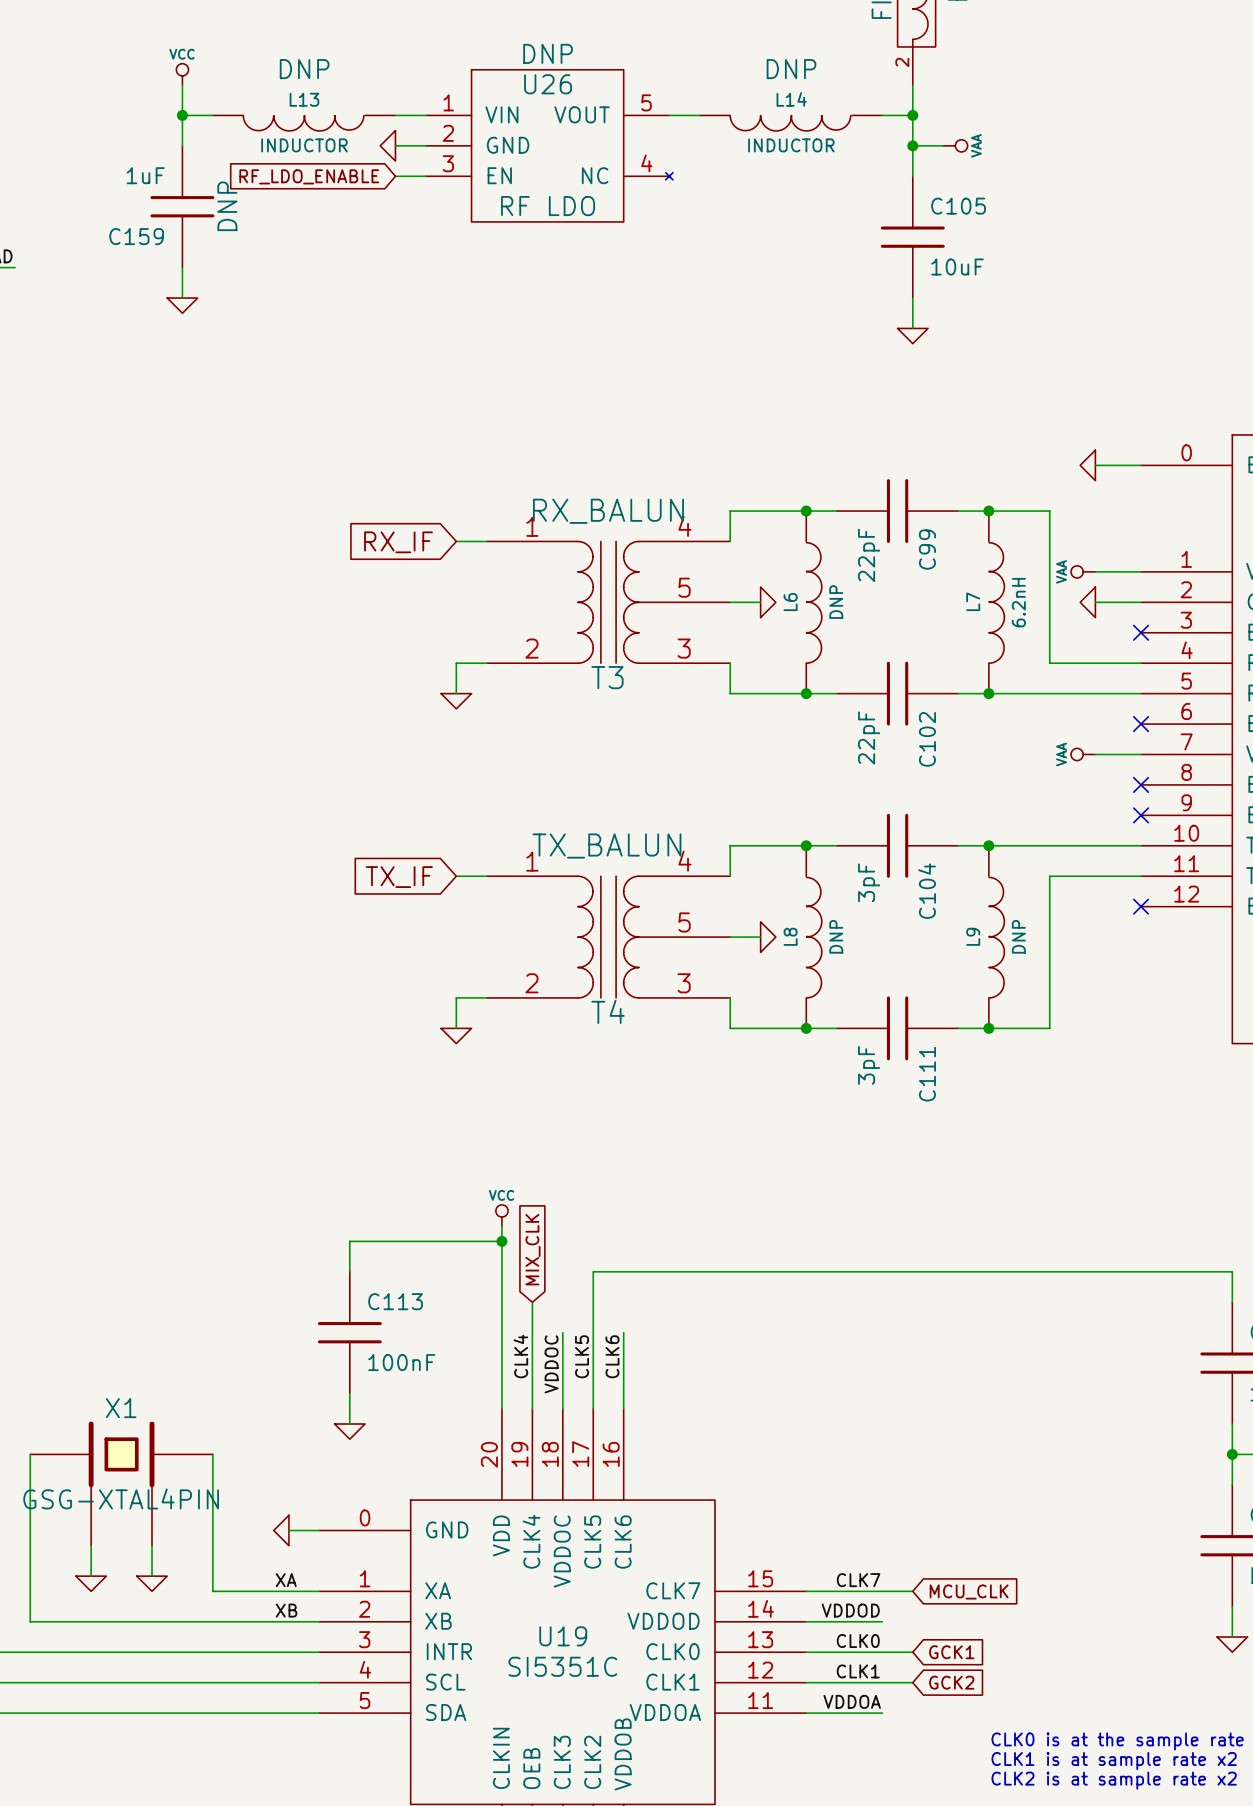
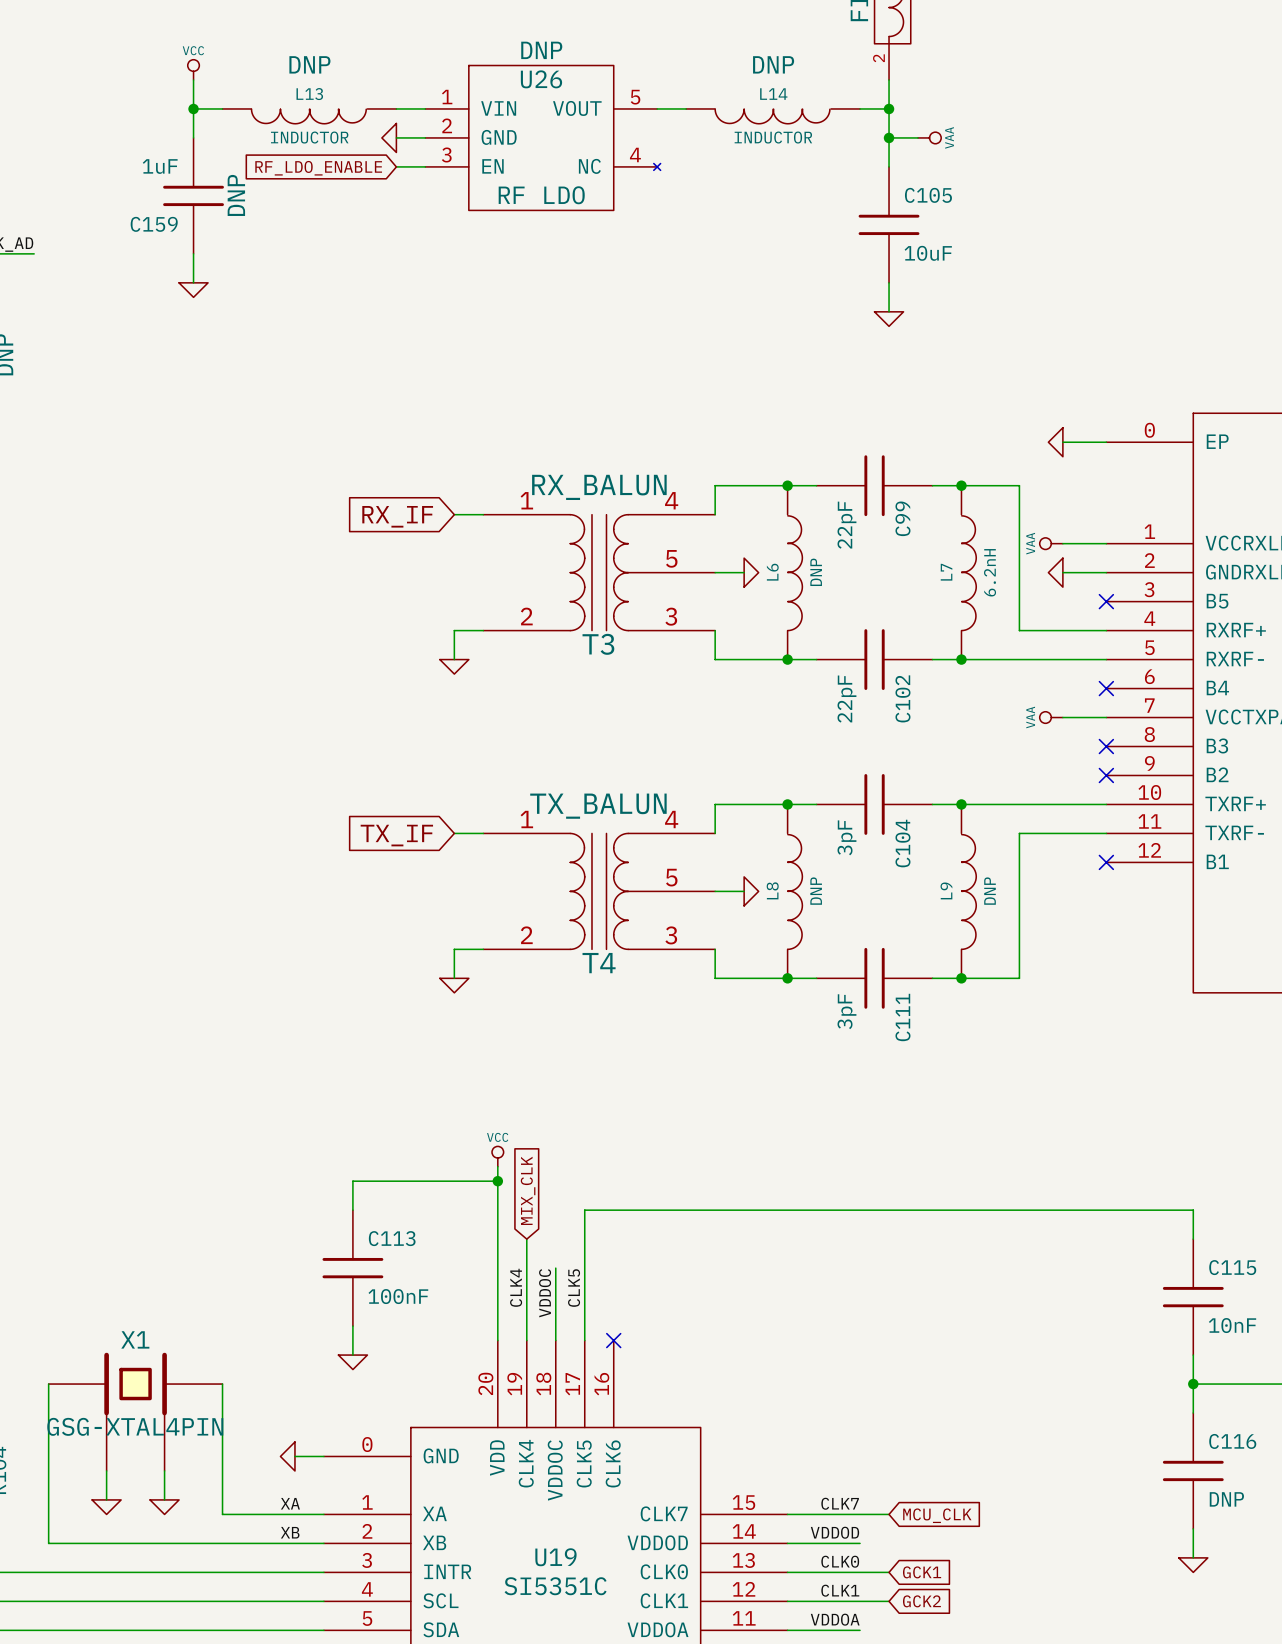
wire: (623, 1332) (623, 1408) -> none
label: CLK6 (612, 1356) -> none
no-connect mark: none -> (613, 1340)

